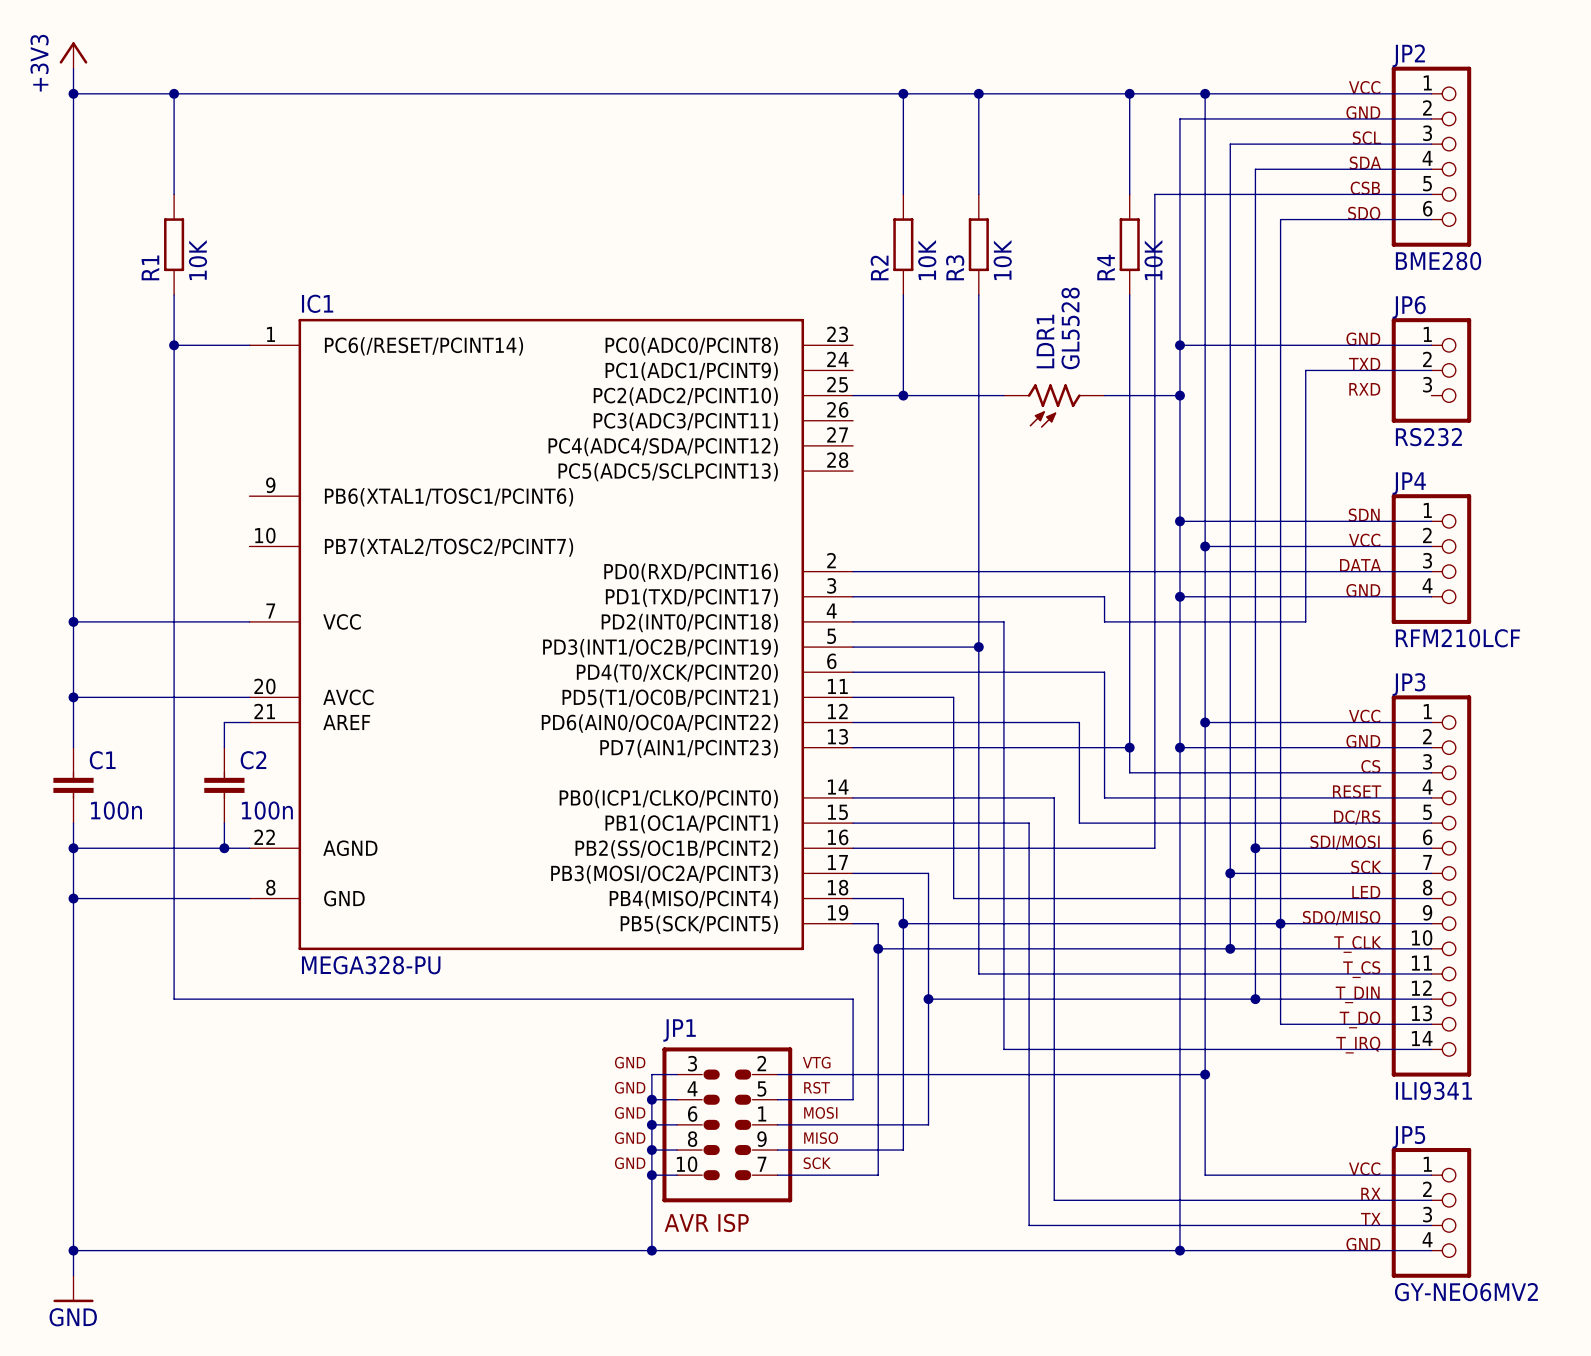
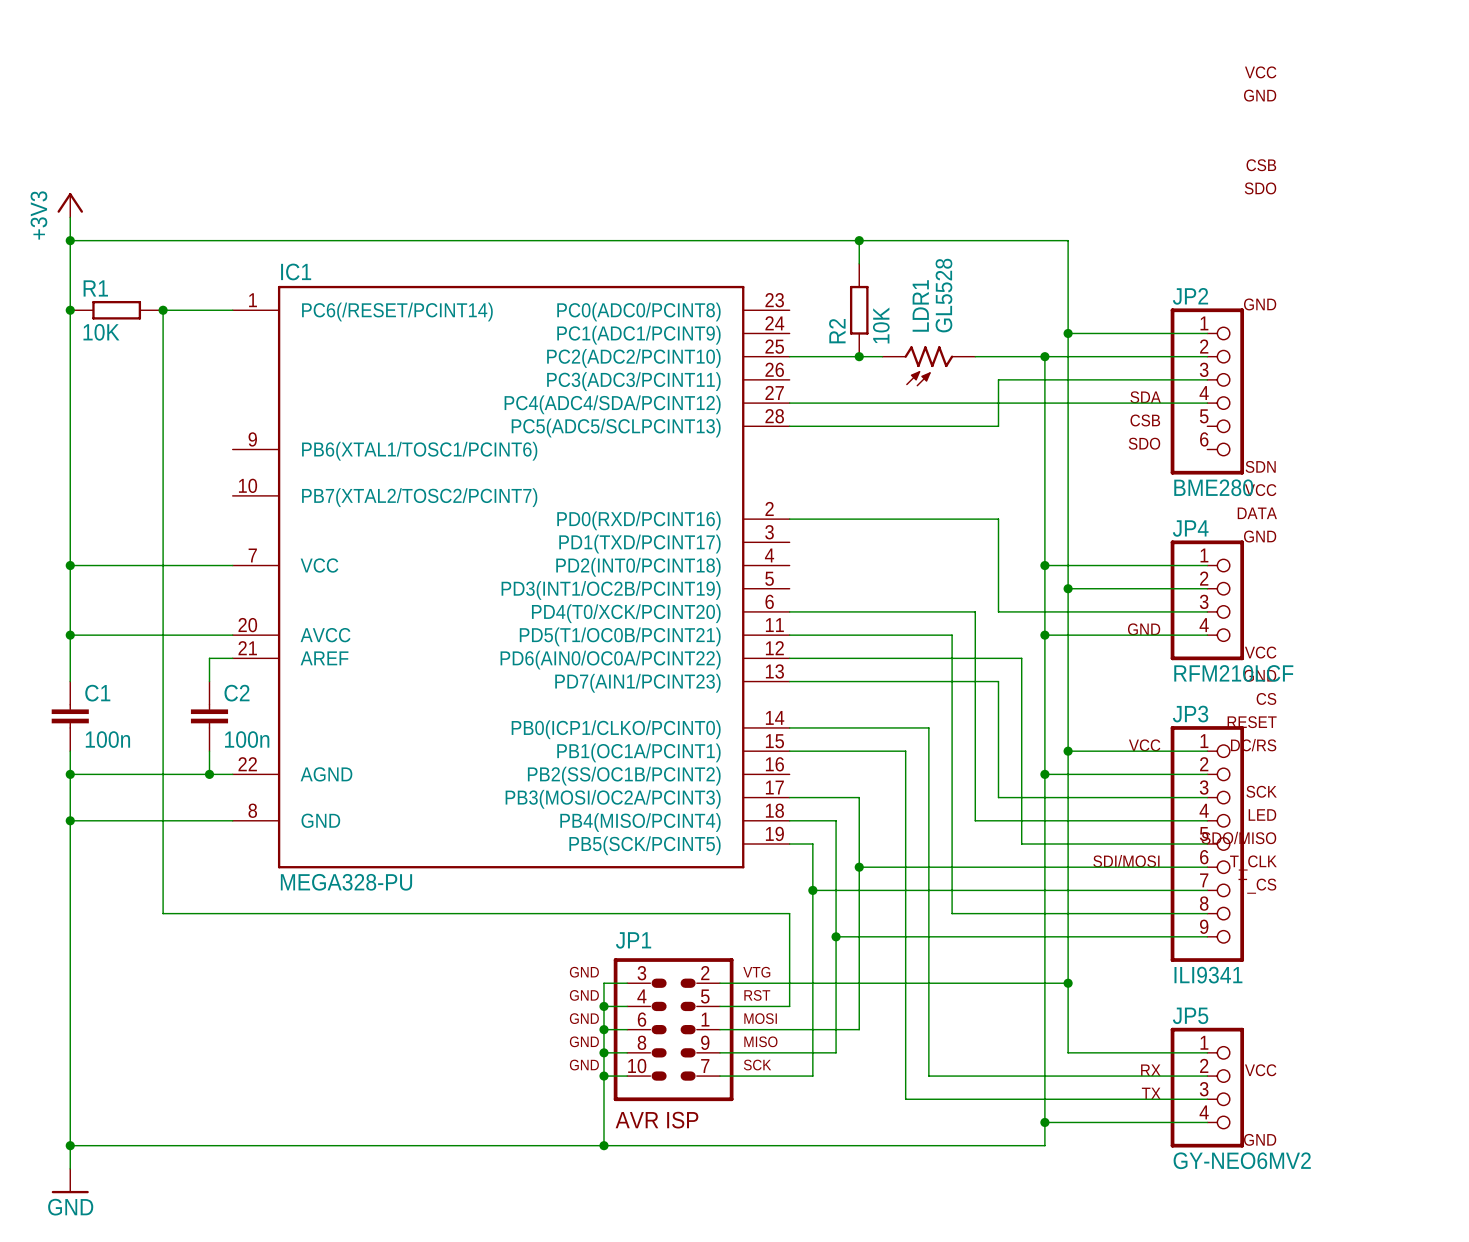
power symbol position: +3V3 (73, 55) -> +3V3 (70, 205)
wire: (73, 68) (73, 244) -> none
wire: (73, 93) (1431, 93) -> none
junction: (73, 93) -> none
wire: (174, 93) (174, 194) -> none
junction: (174, 93) -> none
wire: (903, 93) (903, 194) -> none
junction: (903, 93) -> none
wire: (978, 93) (978, 194) -> none
junction: (978, 93) -> none
wire: (1129, 93) (1129, 194) -> none
junction: (1129, 93) -> none
wire: (1205, 93) (1205, 1175) -> none
junction: (1205, 93) -> none
wire: (1431, 118) (1179, 118) (1179, 1250) -> none
text: SCL (1366, 137) -> none
wire: (1431, 144) (1230, 144) (1230, 948) -> none
JP2 position: (1431, 156) -> (1207, 391)
text: SDA (1365, 162) -> none
wire: (1431, 169) (1255, 169) (1255, 999) -> none
wire: (1431, 194) (1154, 194) (1154, 269) -> (70, 240) (1068, 240)
wire: (1431, 219) (1280, 219) (1280, 1024) -> (836, 936) (1184, 936)
R1 rotation: 0° (174, 244) -> 90° clockwise (116, 310)
R1 position: (174, 244) -> (116, 310)
R2 position: (903, 244) -> (859, 310)
R3: 10K (978, 244) -> none
R4: 10K (1129, 244) -> none
junction: none -> (70, 240)
wire: none -> (859, 240) (859, 263)
junction: none -> (859, 240)
wire: (174, 295) (174, 345) -> none
wire: (903, 295) (903, 395) -> none
wire: (978, 295) (978, 823) (1029, 823) -> (882, 635) (952, 635) (952, 751)
wire: (1129, 295) (1129, 395) -> none
junction: none -> (70, 310)
wire: (1179, 345) (1431, 345) -> none
junction: (1179, 345) -> none
text: TXD (1364, 364) -> none
wire: none -> (1068, 333) (1207, 333)
junction: none -> (1068, 333)
wire: (1431, 370) (1305, 370) (1305, 621) -> none
JP6: RS232 (1431, 370) -> none
text: RXD (1364, 389) -> none
junction position: (903, 395) -> (859, 356)
junction: none -> (1044, 356)
wire: none -> (1091, 356) (1207, 356)
junction: (1179, 395) -> none
LDR1 position: (1054, 406) -> (928, 366)
wire: none -> (1207, 379) (998, 379) (998, 426) (789, 426)
text: none -> SDA (1145, 397)
wire: none -> (789, 403) (1207, 403)
text: none -> CSB (1145, 420)
text: none -> SDO (1144, 443)
wire: (1179, 521) (1431, 521) -> none
junction: (1179, 521) -> none
wire: (1205, 546) (1431, 546) -> none
junction: (1205, 546) -> none
JP4 position: (1431, 559) -> (1207, 600)
wire: (1079, 571) (1431, 571) -> none
wire: (853, 596) (1104, 596) (1104, 621) (1129, 621) -> none
wire: (1179, 596) (1431, 596) -> none
junction: (1179, 596) -> none
wire: (853, 621) (1003, 621) (1003, 797) (1054, 797) -> (975, 611) (975, 727)
junction: none -> (1044, 565)
wire: (853, 647) (978, 647) -> none
junction: (978, 647) -> none
wire: none -> (1068, 588) (1207, 588)
junction: none -> (1068, 588)
wire: (1054, 672) (1079, 672) -> (998, 519) (998, 611)
wire: (1104, 672) (1104, 722) -> (1021, 611) (1207, 611)
JP3 name position: JP3 (1408, 684) -> JP3 (1190, 714)
text: none -> GND (1144, 629)
JP3 symbol: [1391, 695, 1472, 1077] -> [1170, 726, 1245, 962]
wire: (953, 697) (953, 898) (1054, 898) (1054, 1200) -> (812, 890) (905, 890) (905, 1099) (975, 1099)
wire: none -> (1044, 635) (1207, 635)
junction: none -> (1044, 635)
wire: (1079, 722) (1079, 747) (1129, 747) -> (998, 658) (1021, 658)
wire: (1205, 722) (1431, 722) -> none
junction: (1205, 722) -> none
junction: (1129, 747) -> none
wire: (1179, 747) (1431, 747) -> none
junction: (1179, 747) -> none
wire: (1129, 772) (1431, 772) -> (1044, 704) (1044, 1145)
wire: (1104, 797) (1431, 797) -> none
text: none -> VCC (1144, 745)
wire: (1079, 823) (1154, 823) -> (998, 751) (998, 797) (1137, 797)
junction: none -> (1068, 751)
wire: (1305, 823) (1431, 823) -> none
text position: SDI/MOSI (1345, 842) -> SDI/MOSI (1126, 861)
wire: (853, 848) (1129, 848) -> none
junction: none -> (1044, 774)
wire: none -> (1160, 774) (1068, 774) (1068, 1052) (1207, 1052)
junction: (1255, 848) -> none
wire: (1305, 848) (1431, 848) -> none
junction: (1230, 873) -> none
wire: (1305, 873) (1431, 873) -> none
wire: (1305, 898) (1431, 898) -> none
wire: (903, 923) (1104, 923) -> (1021, 727) (1021, 844)
junction: (903, 923) -> none
junction: (1280, 923) -> none
wire: (1305, 923) (1431, 923) -> none
wire: (878, 948) (928, 948) -> none
junction: (878, 948) -> none
junction: none -> (859, 867)
junction: (1230, 948) -> none
wire: (1305, 948) (1431, 948) -> none
junction: none -> (812, 890)
wire: (1305, 973) (1431, 973) -> none
text: T_DIN (1357, 994) -> none
wire: (928, 999) (1029, 999) (1029, 1225) (1129, 1225) -> none
junction: (928, 999) -> none
junction: (1255, 999) -> none
wire: (1305, 999) (1431, 999) -> none
text: T_DO (1360, 1019) -> none
junction: none -> (836, 936)
wire: (1305, 1024) (1431, 1024) -> none
text: T_IRQ (1358, 1045) -> none
wire: (1003, 1049) (1431, 1049) -> (928, 960) (928, 1076) (1114, 1076)
wire: (1154, 1074) (1205, 1074) -> none
junction position: (1205, 1074) -> (1068, 983)
JP3 value position: ILI9341 (1433, 1090) -> ILI9341 (1208, 975)
wire: (1305, 1175) (1431, 1175) -> none
text position: RX (1370, 1194) -> RX (1150, 1070)
wire: (1305, 1200) (1431, 1200) -> none
JP5 position: (1431, 1212) -> (1207, 1087)
text position: TX (1370, 1219) -> TX (1151, 1093)
wire: (1305, 1225) (1431, 1225) -> none
wire: (1129, 1250) (1431, 1250) -> none
junction position: (1179, 1250) -> (1044, 1122)

